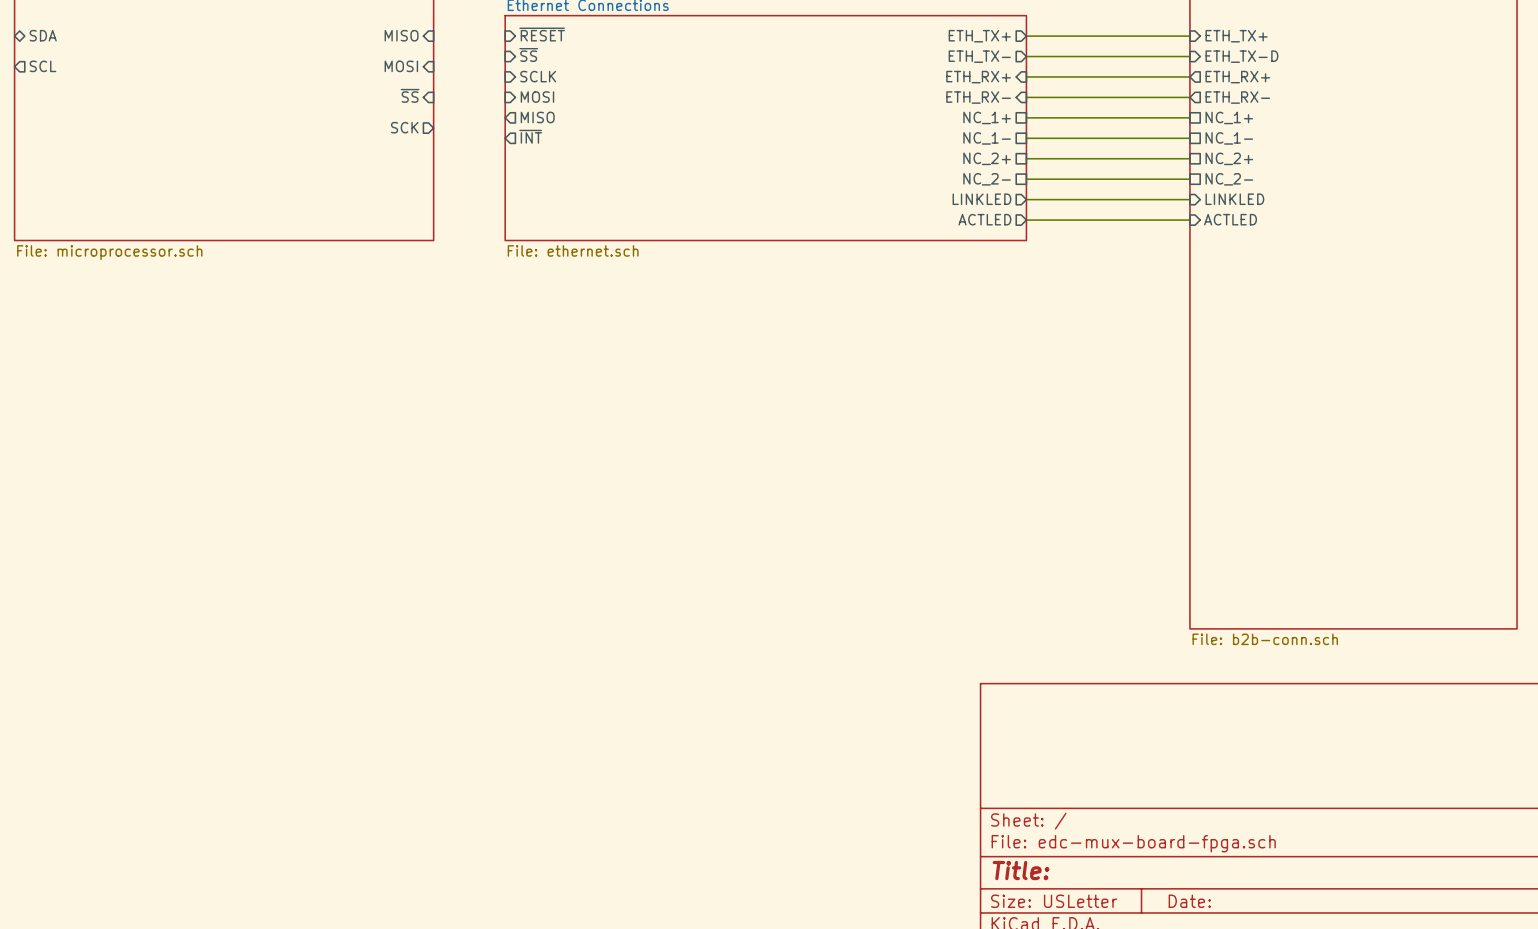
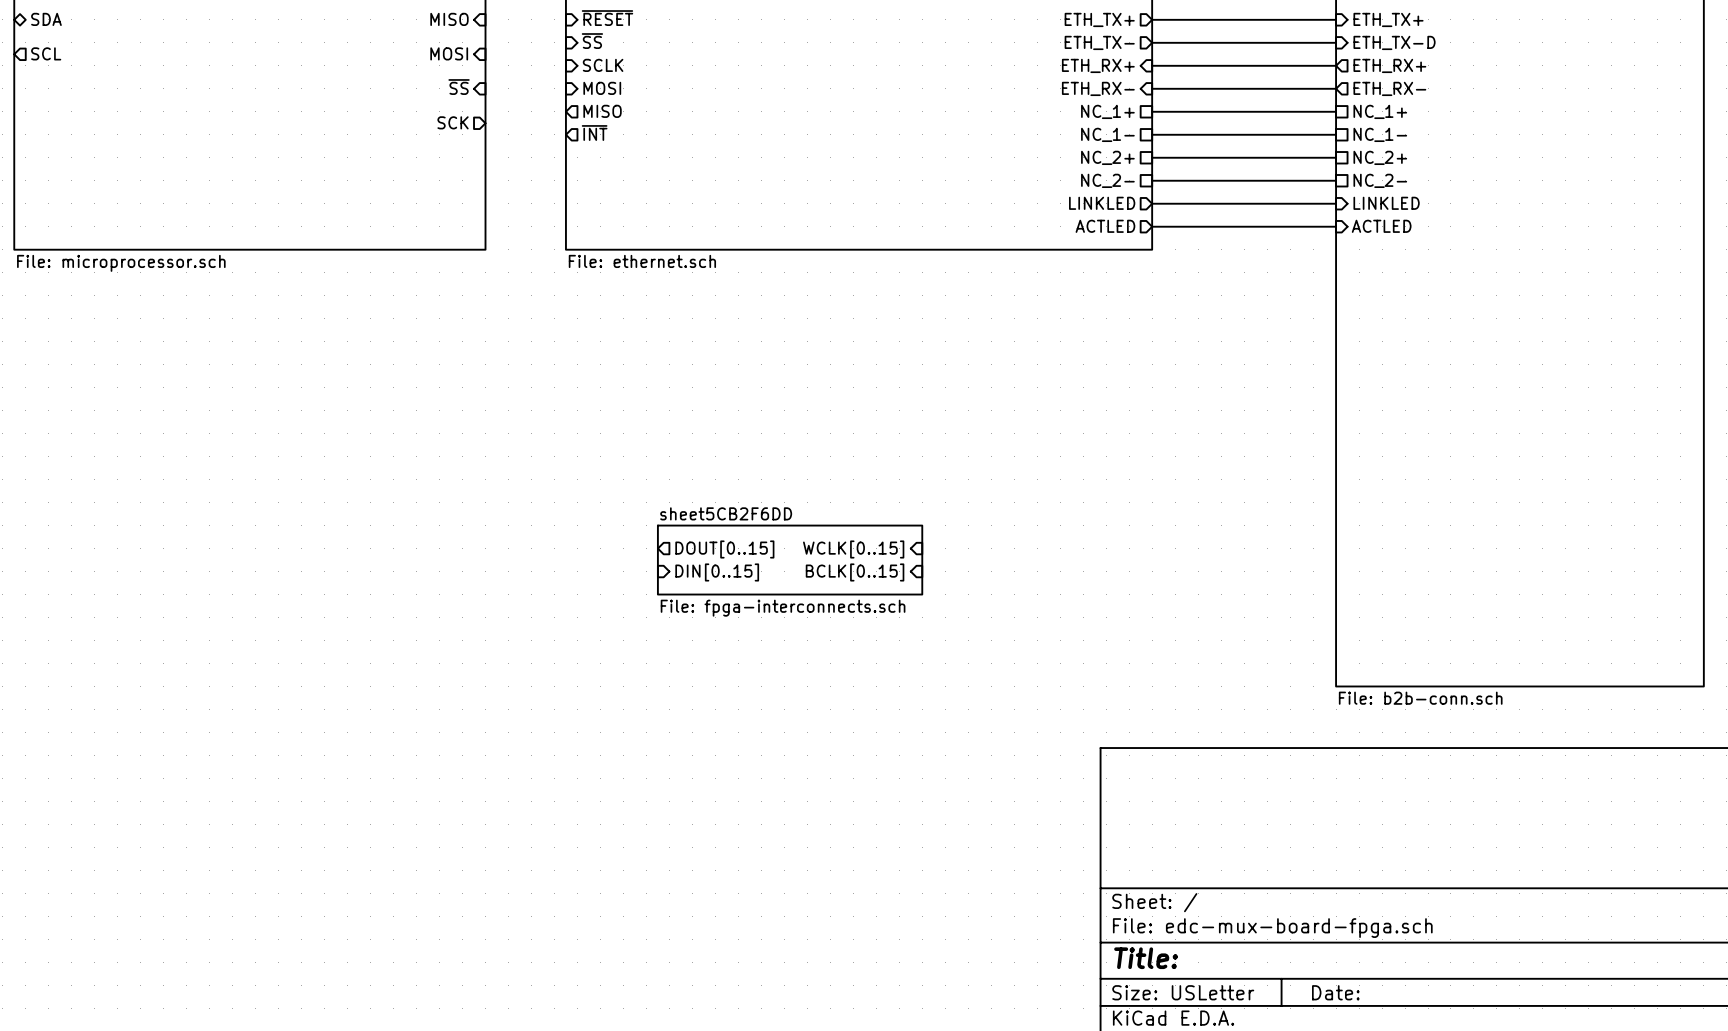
sheet pin: none -> DOUT[0..15] (724, 549)
sheet pin: none -> WCLK[0..15] (853, 549)
sheet sheet5CB2F6DD: none -> File: fpga-interconnects.sch (790, 560)
sheet pin: none -> DIN[0..15] (717, 572)
sheet pin: none -> BCLK[0..15] (855, 572)

